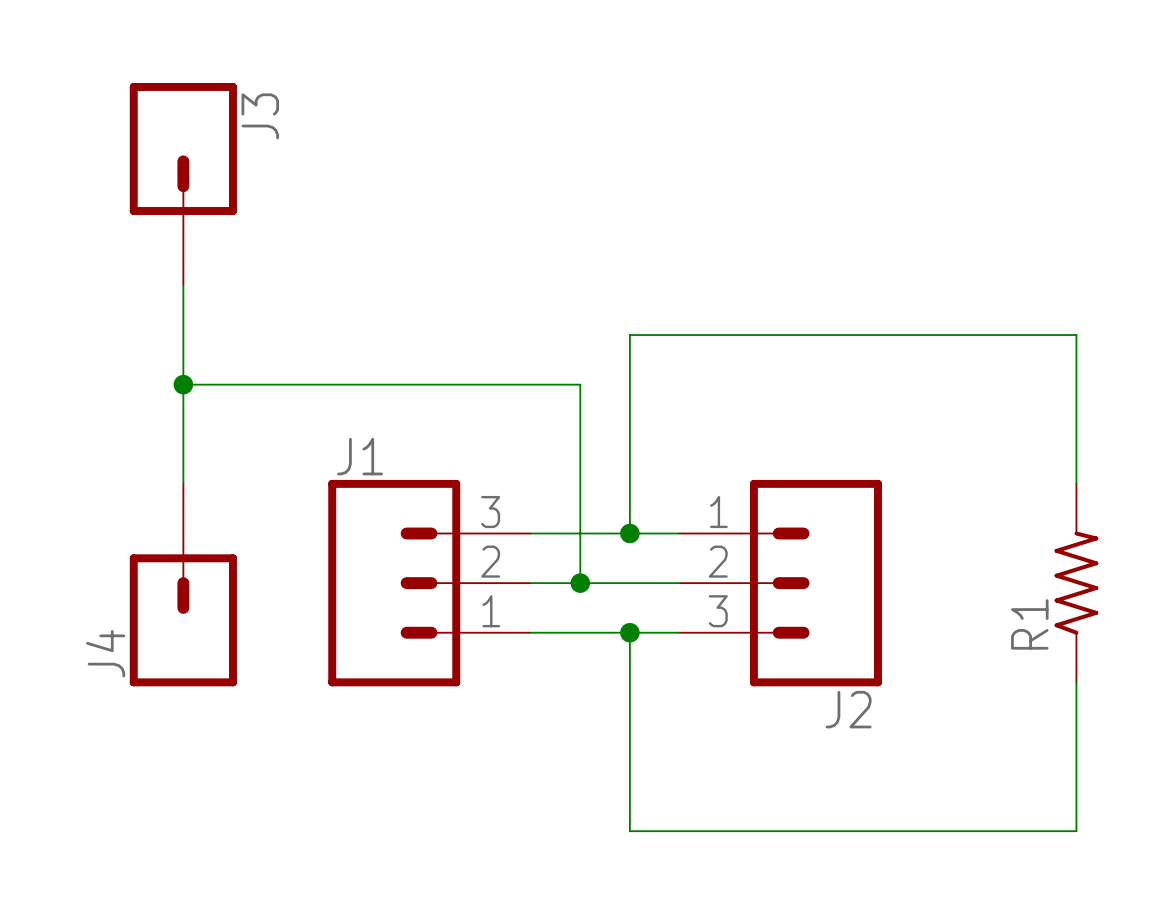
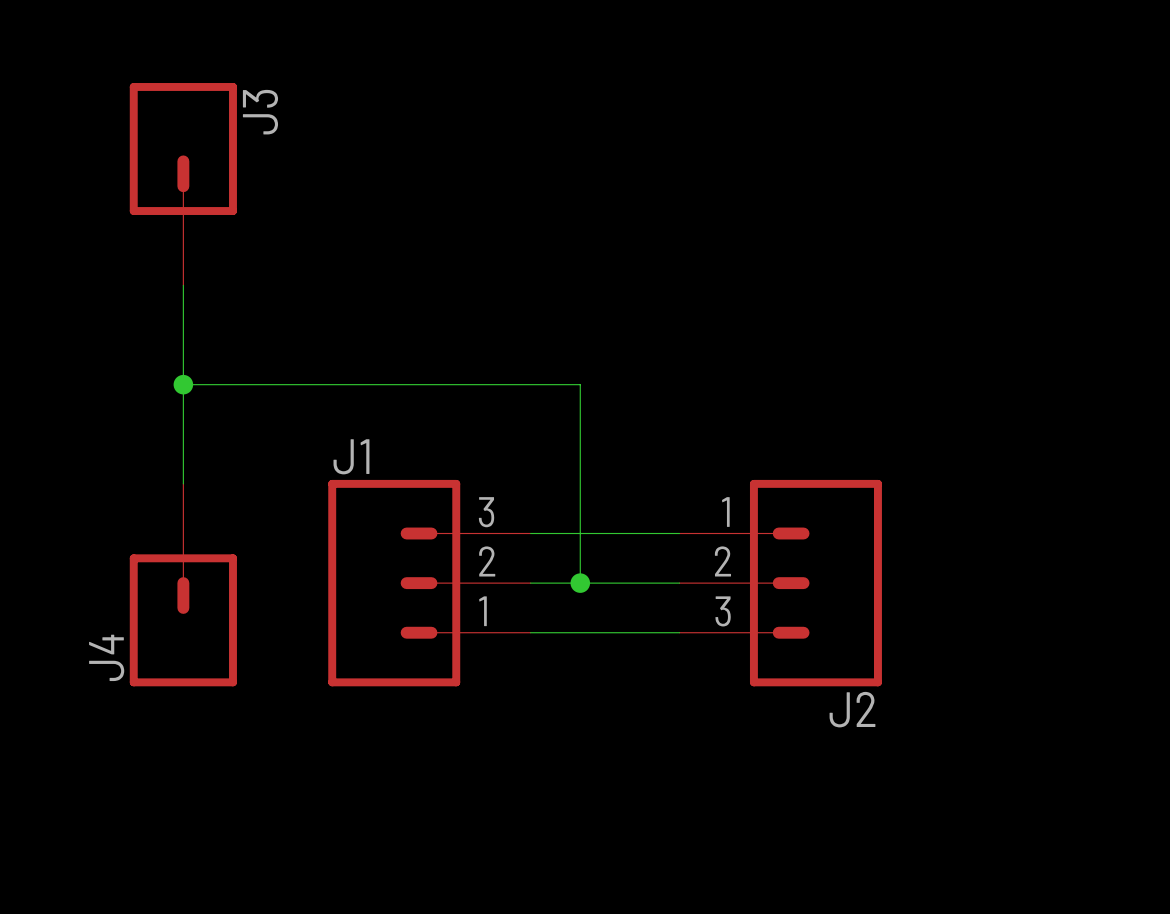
wire: (1076, 483) (1076, 335) (629, 335) (629, 533) -> none
junction: (629, 533) -> none
R1: (1076, 583) -> none
wire: (629, 632) (629, 831) (1076, 831) (1076, 682) -> none
junction: (629, 632) -> none

